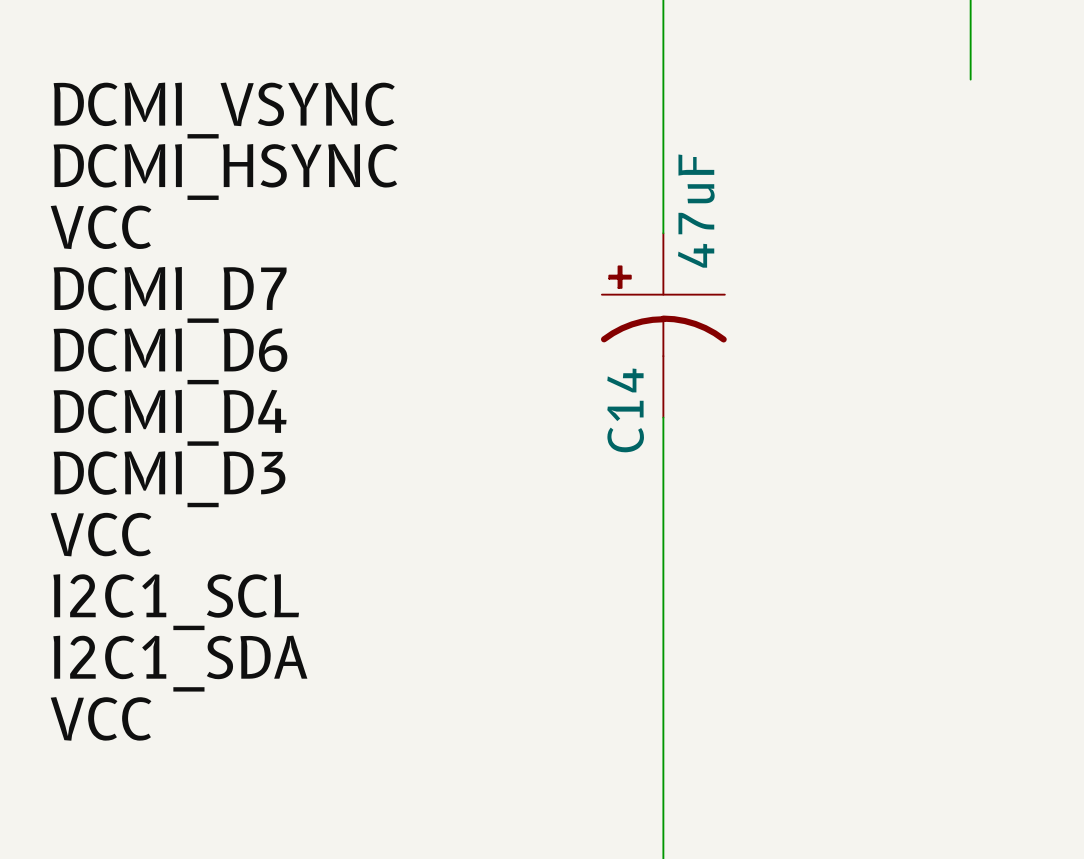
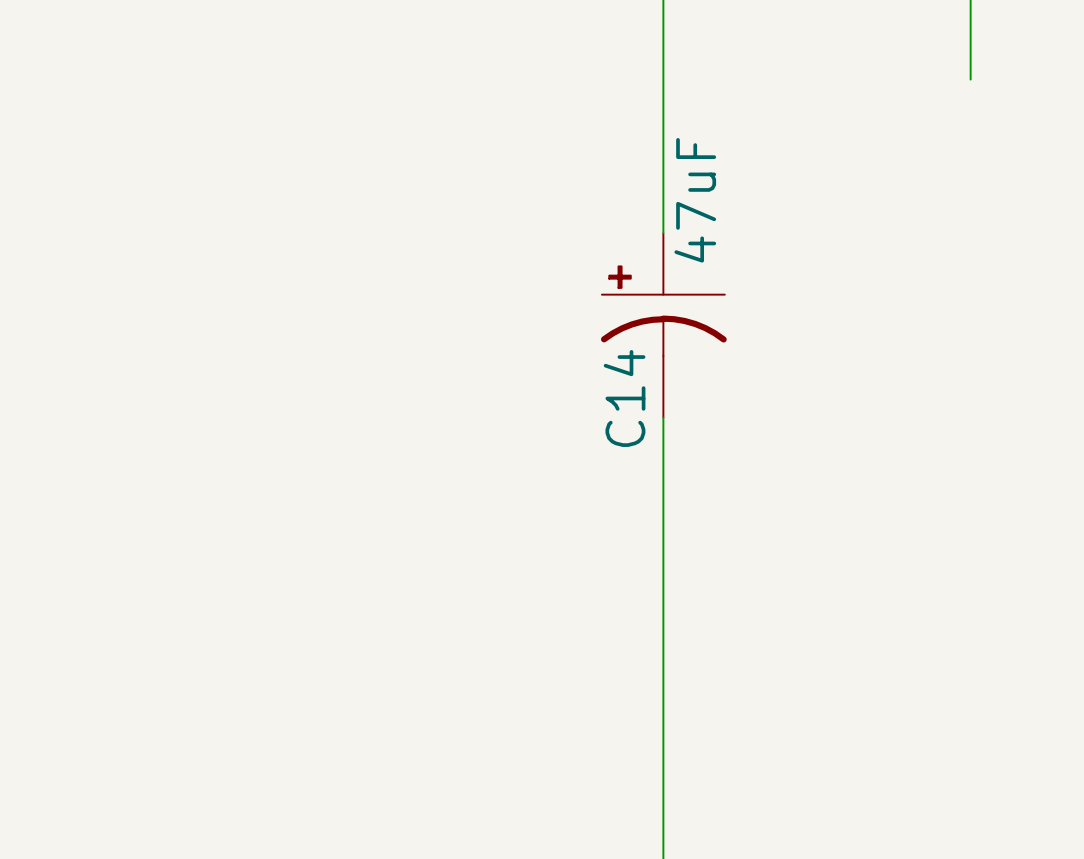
label: DCMI_VSYNC (224, 110) -> none
label: DCMI_HSYNC (225, 171) -> none
label: VCC (101, 227) -> none
label: DCMI_D7 (170, 294) -> none
label: DCMI_D6 (170, 356) -> none
label: DCMI_D4 (170, 417) -> none
label: DCMI_D3 (169, 479) -> none
label: VCC (101, 534) -> none
label: I2C1_SCL (176, 602) -> none
label: I2C1_SDA (180, 663) -> none
label: VCC (101, 718) -> none

